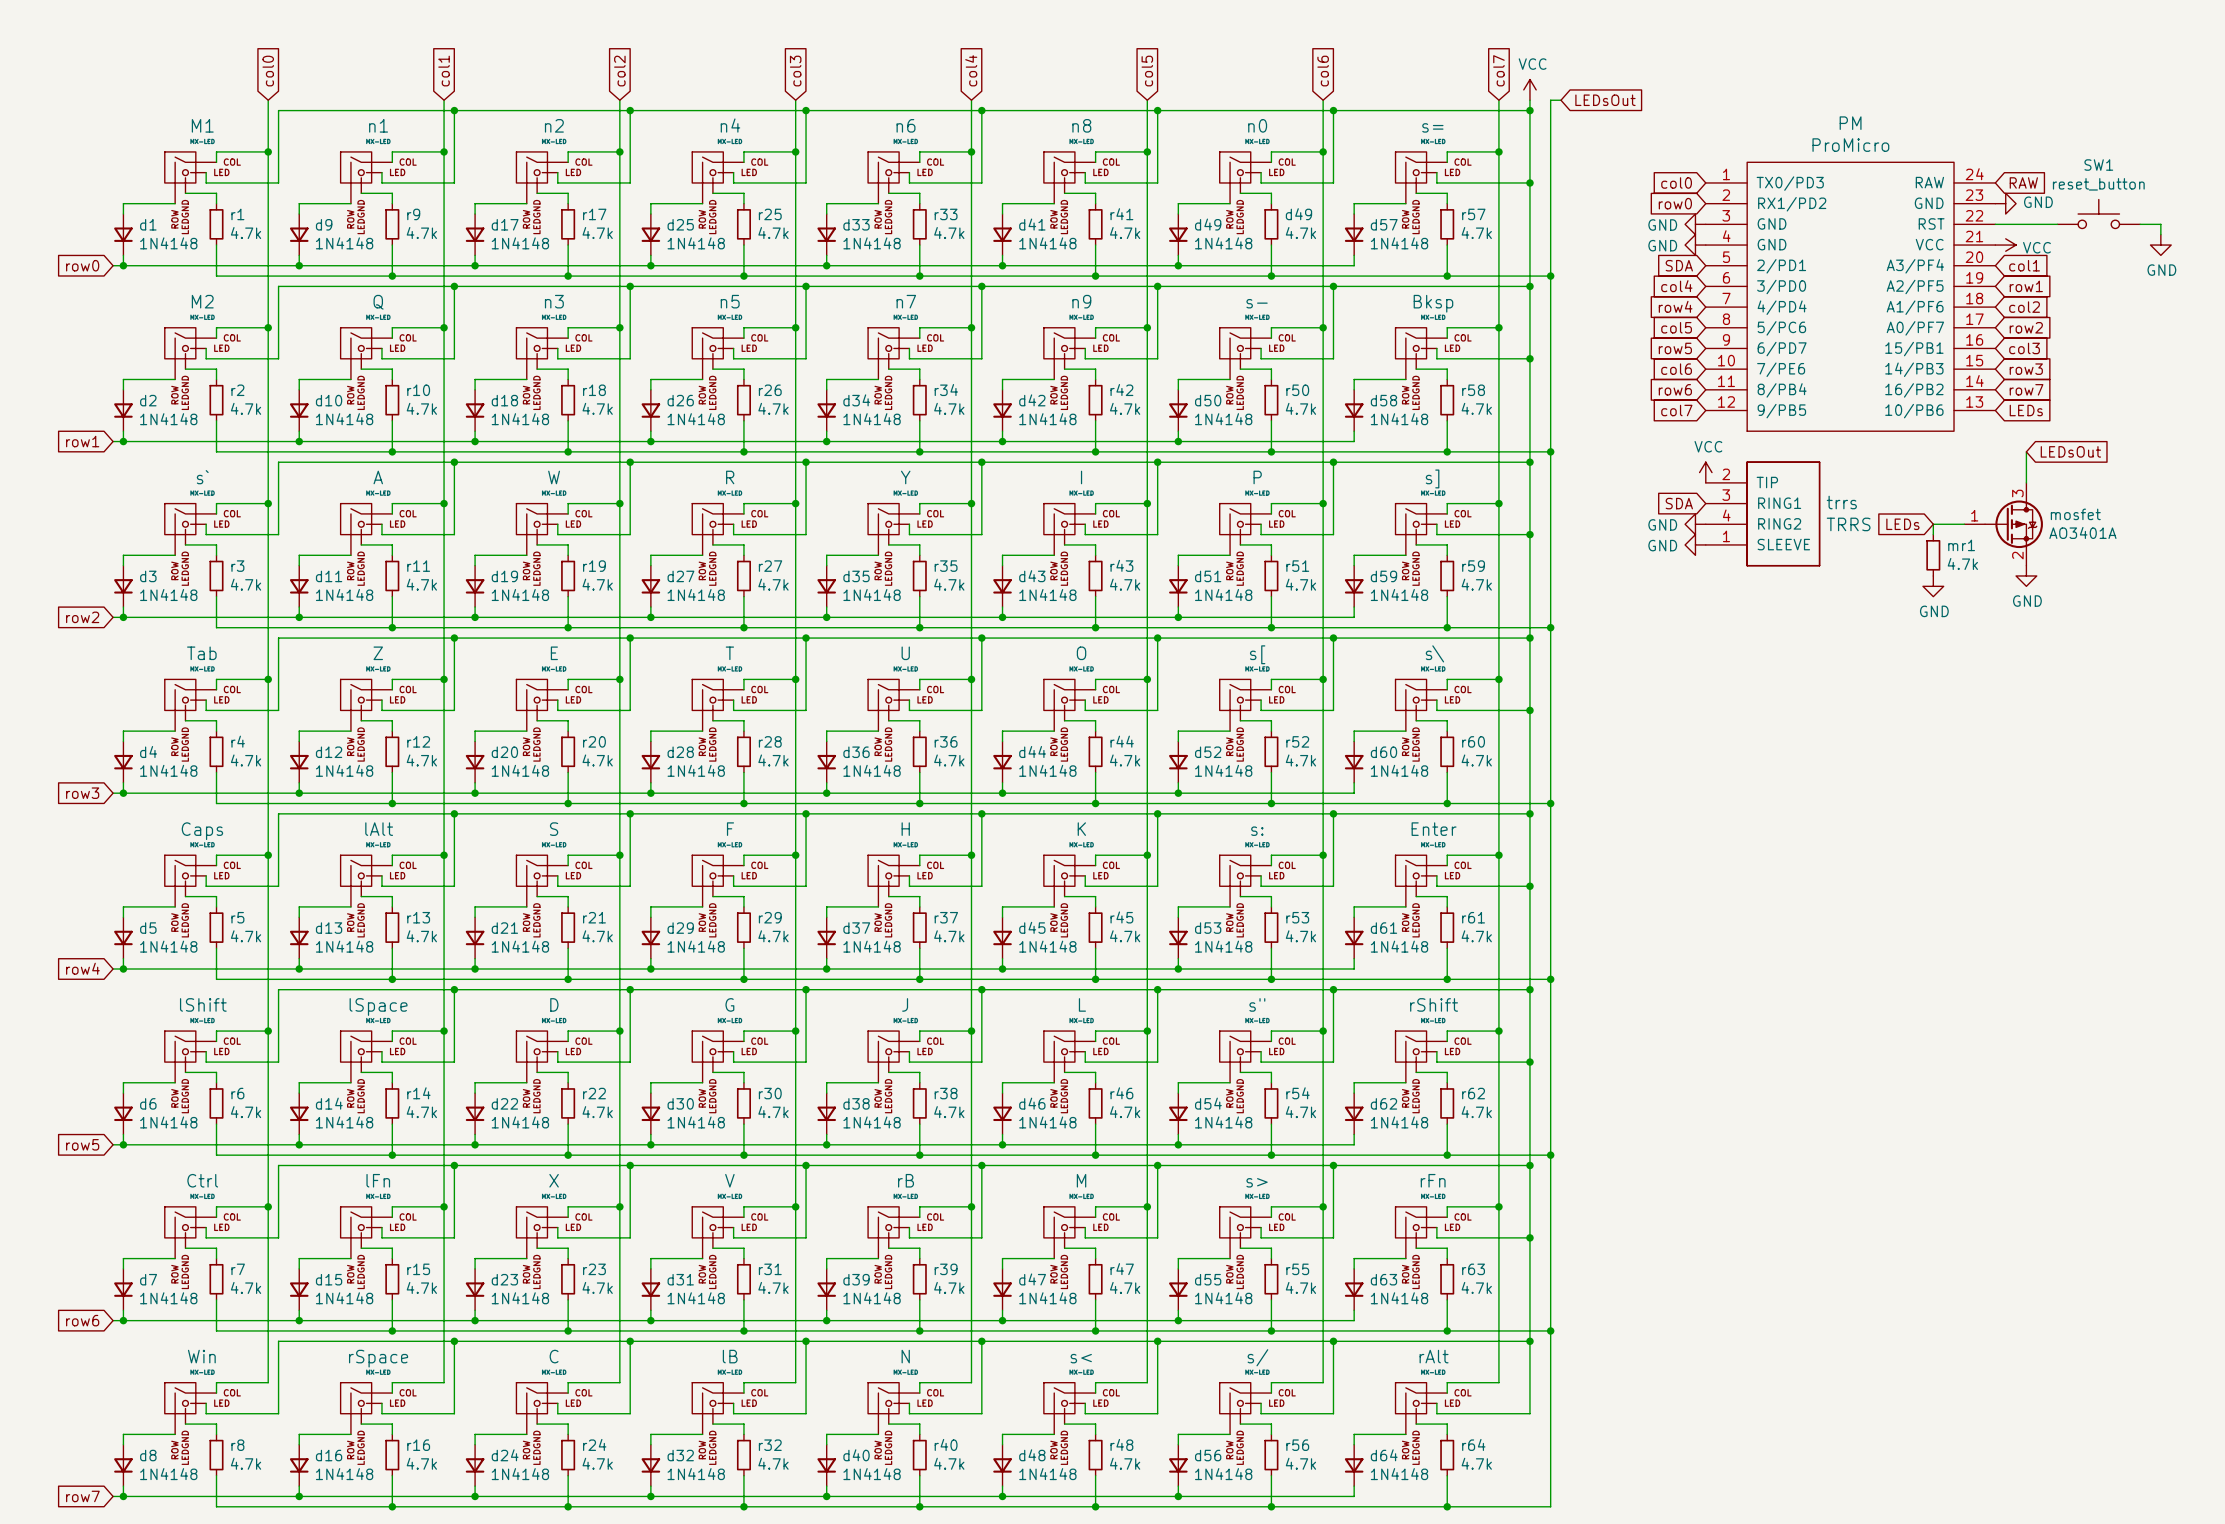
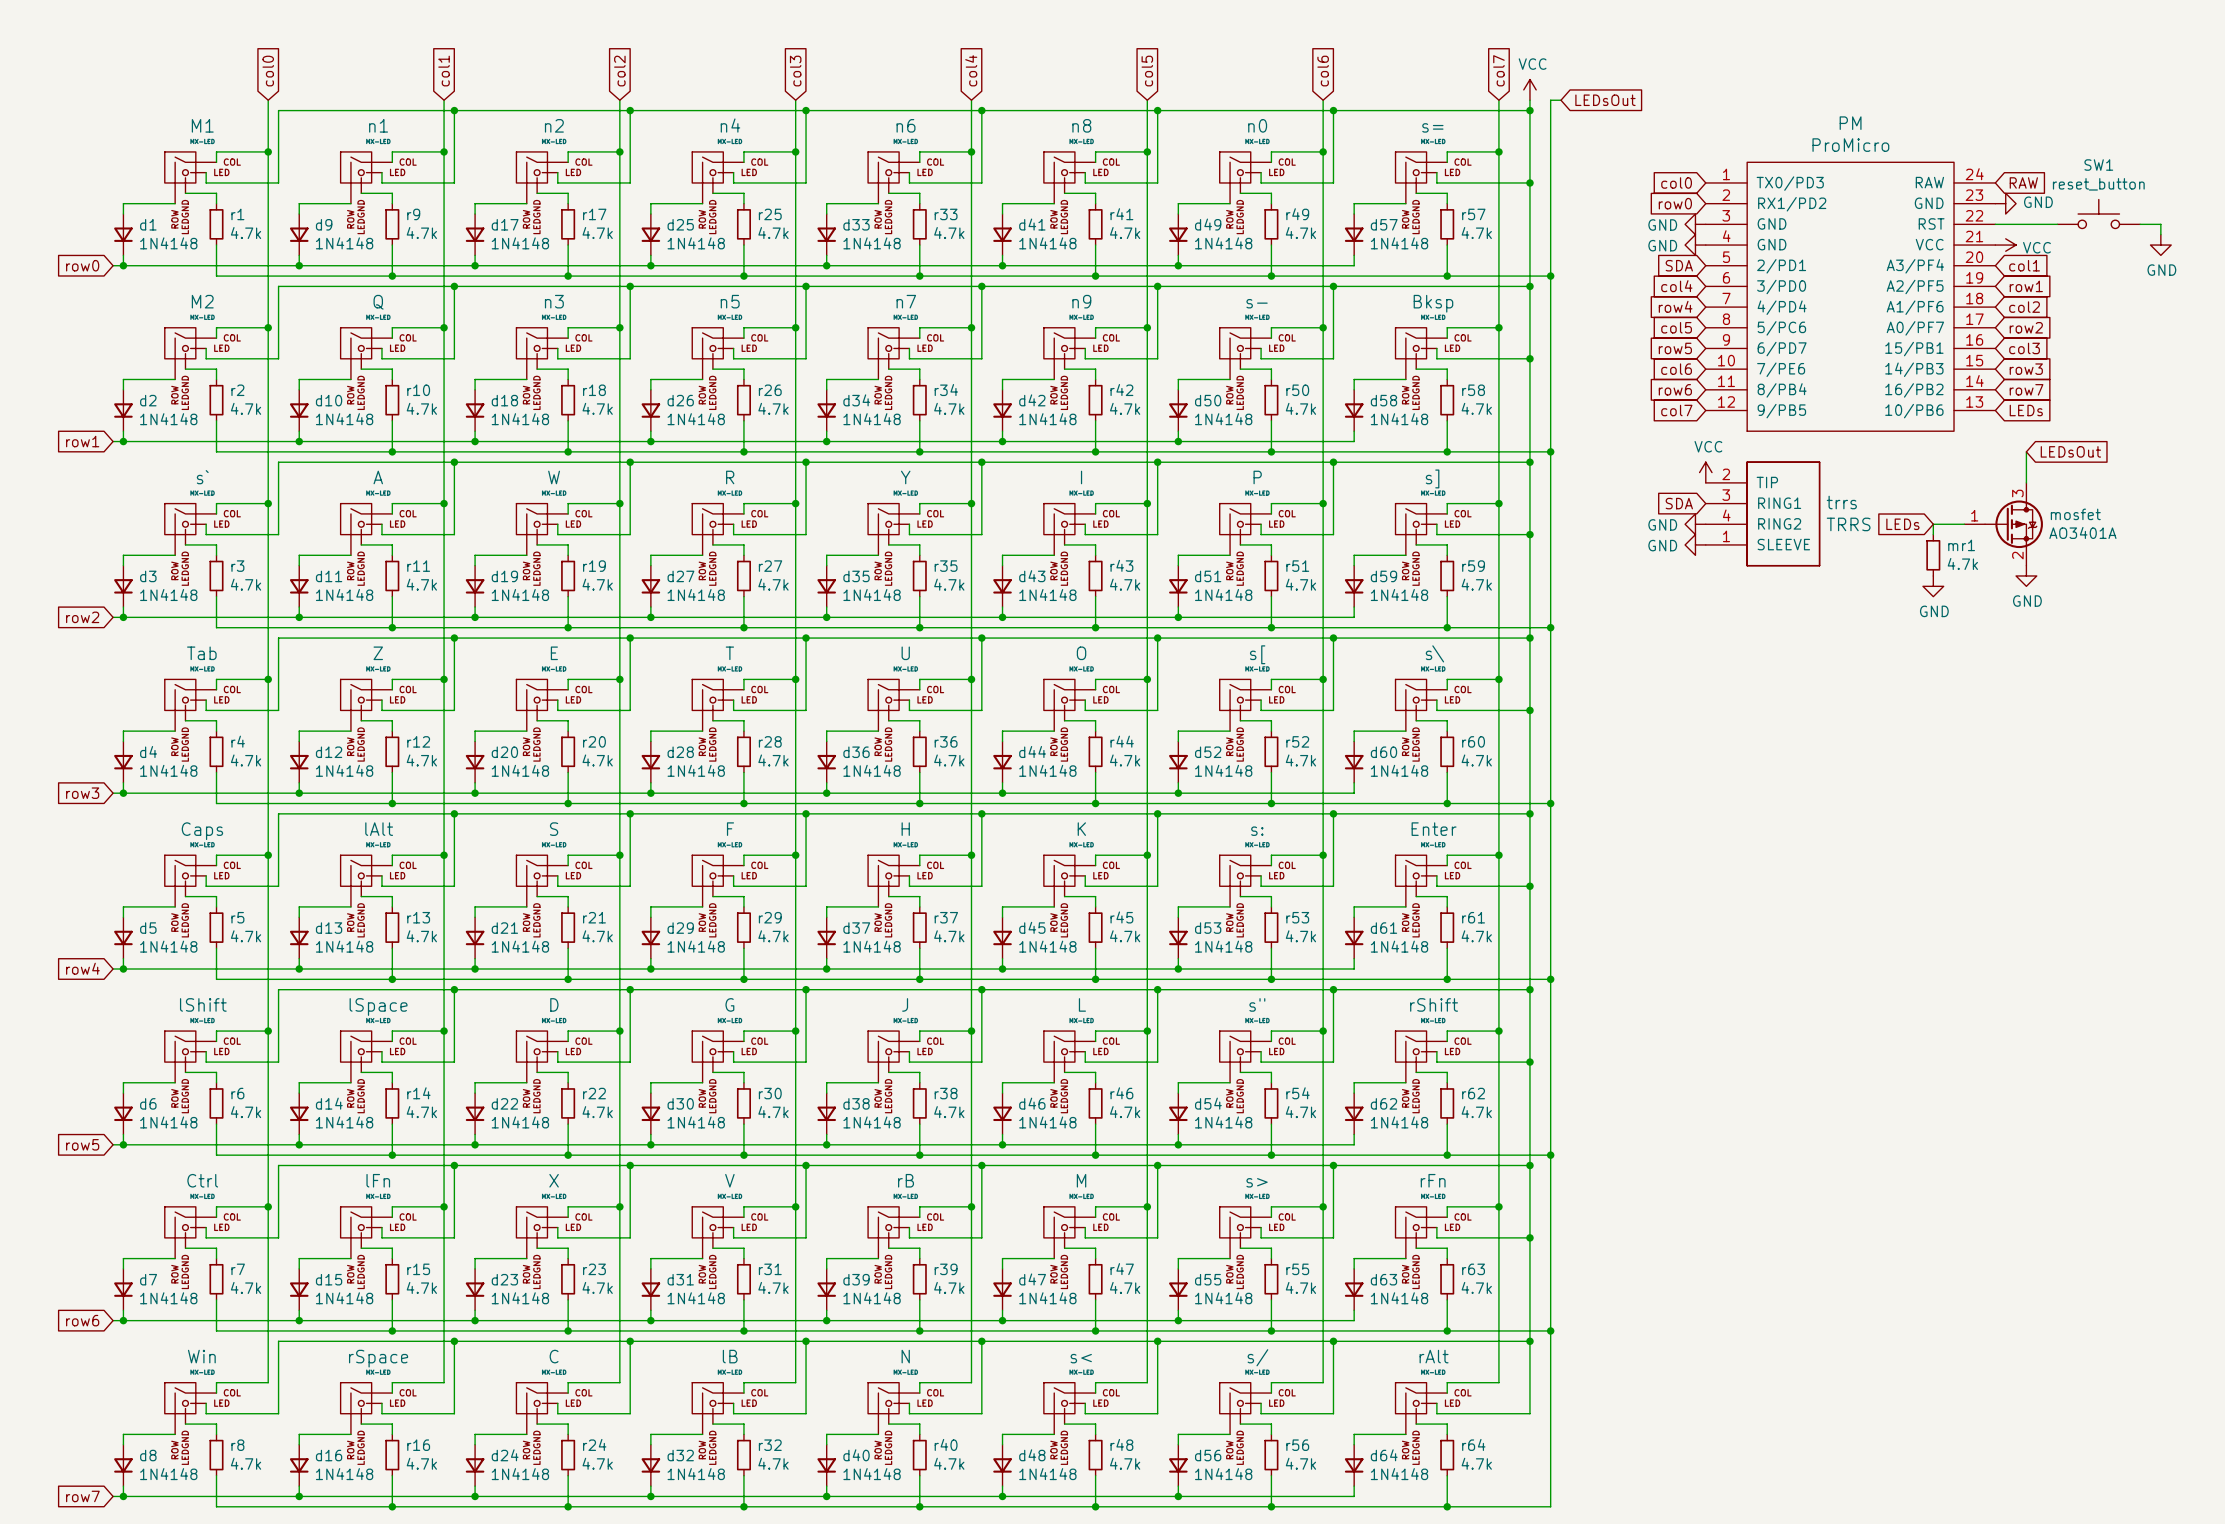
d49 name: d49 (1298, 214) -> r49 (1297, 214)

